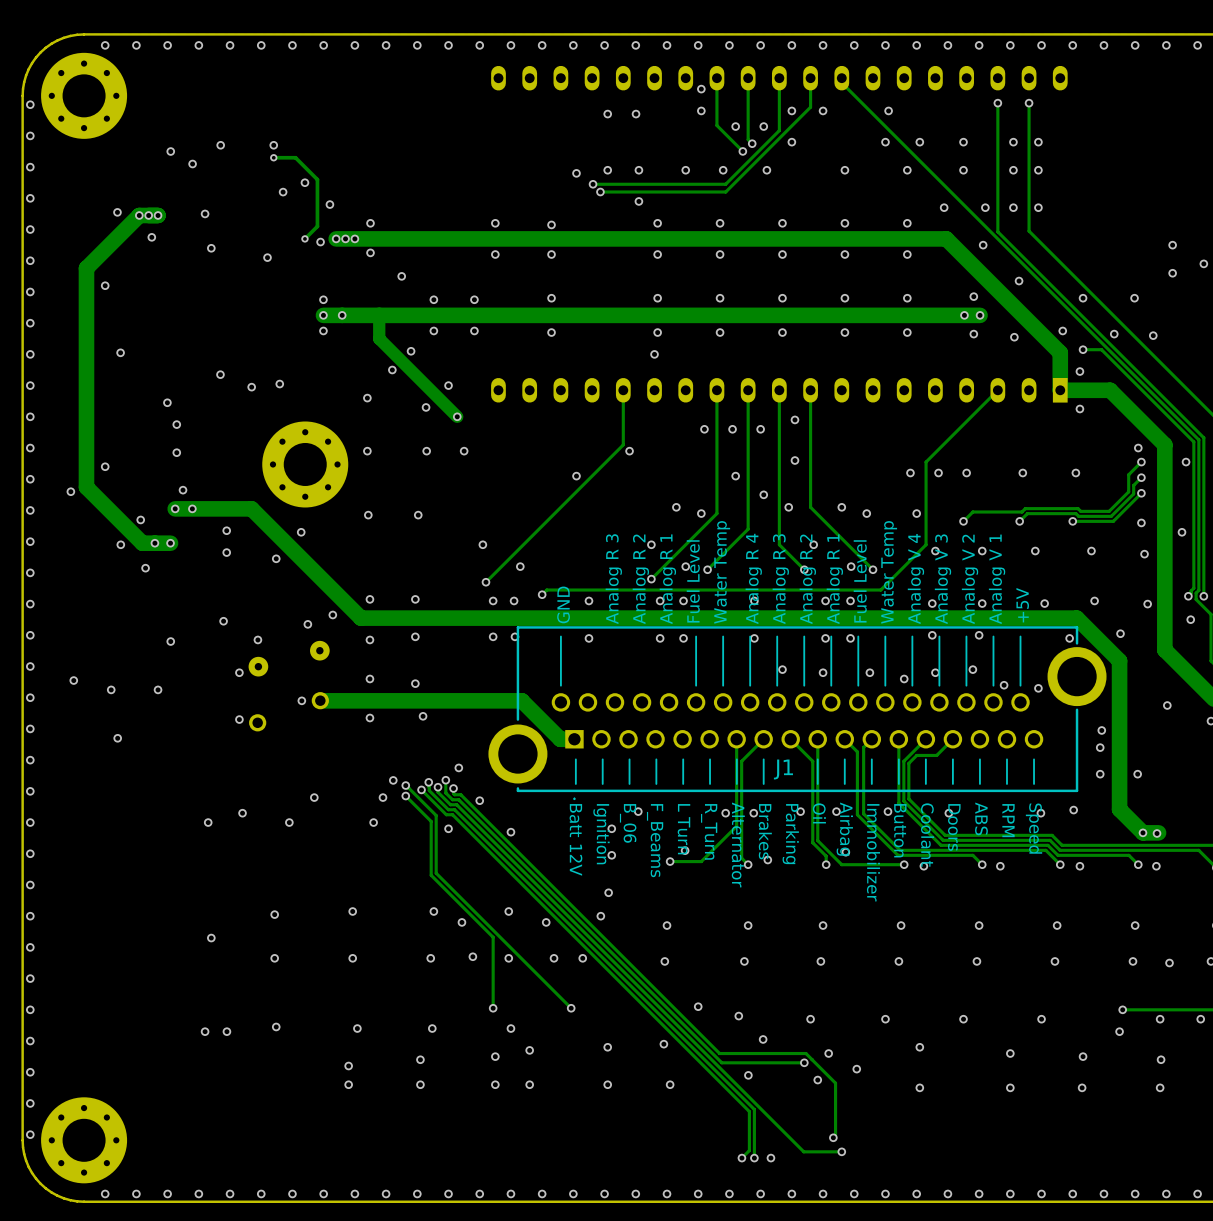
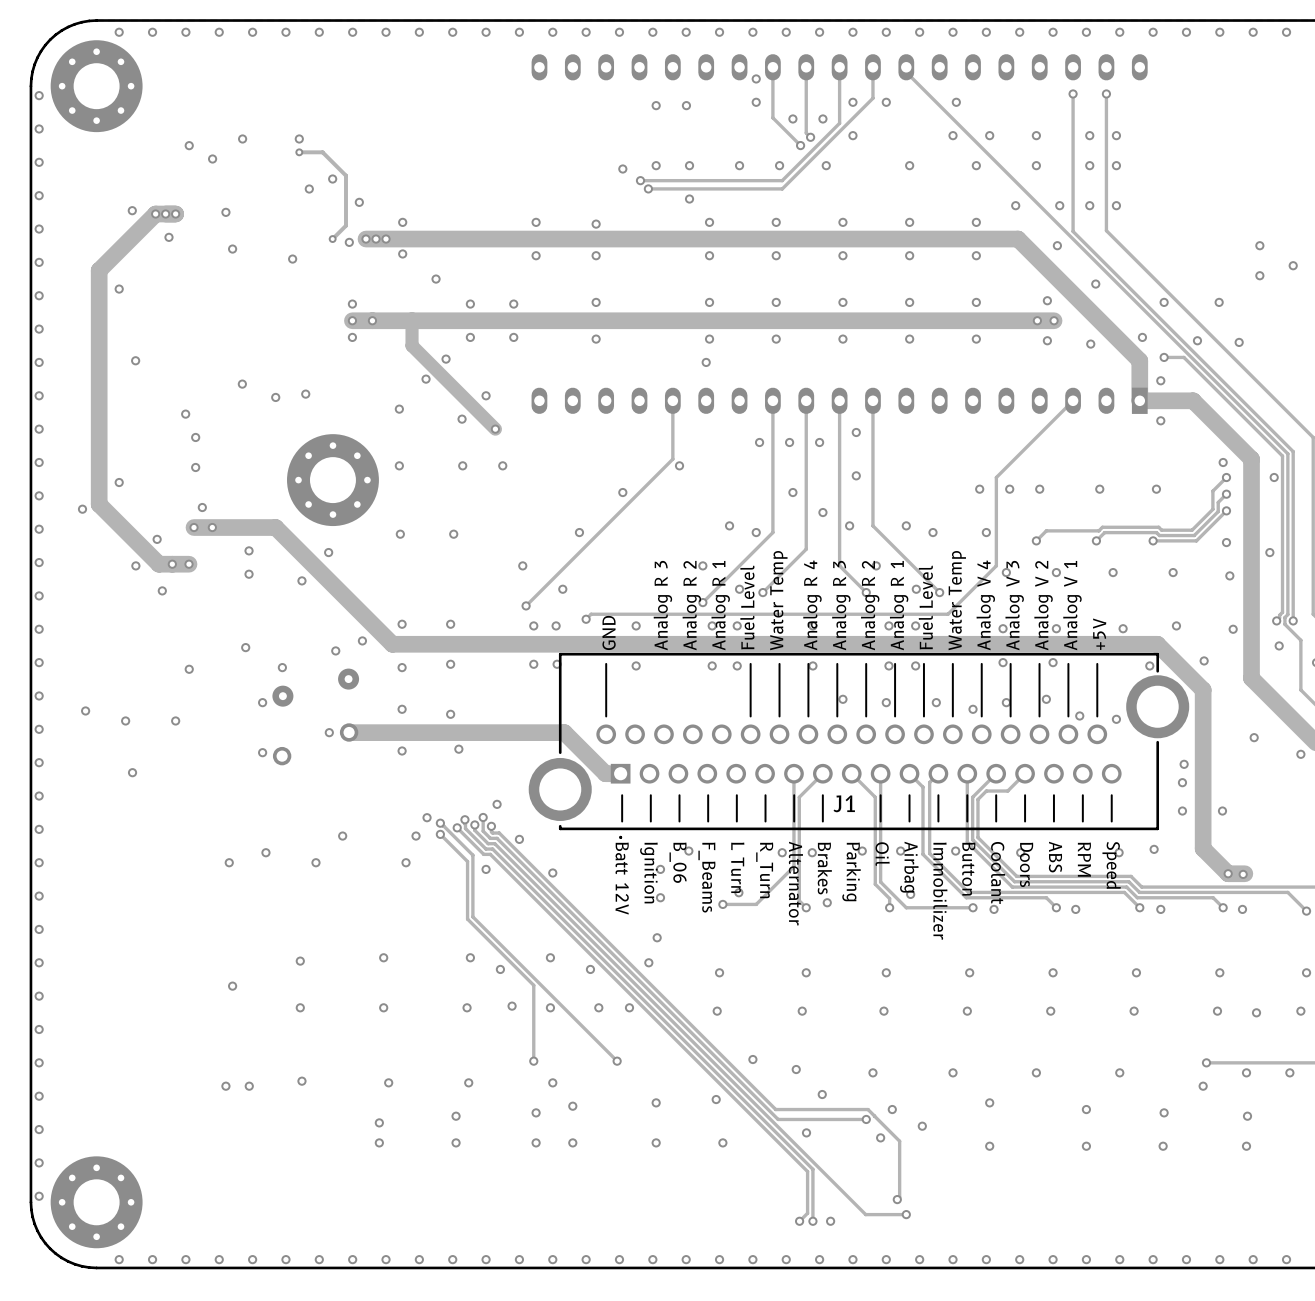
via: none -> (579, 532)

